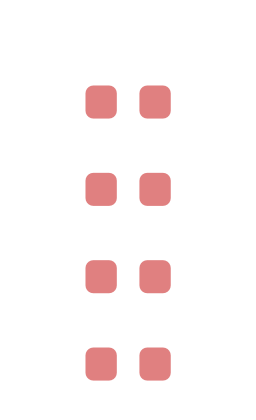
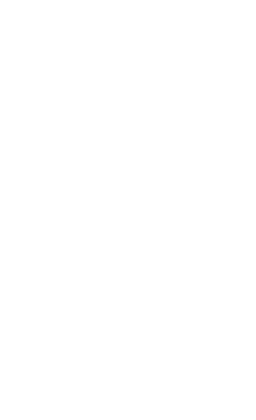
part: (128, 102) -> none
part: (128, 189) -> none
part: (128, 276) -> none
part: (128, 364) -> none

